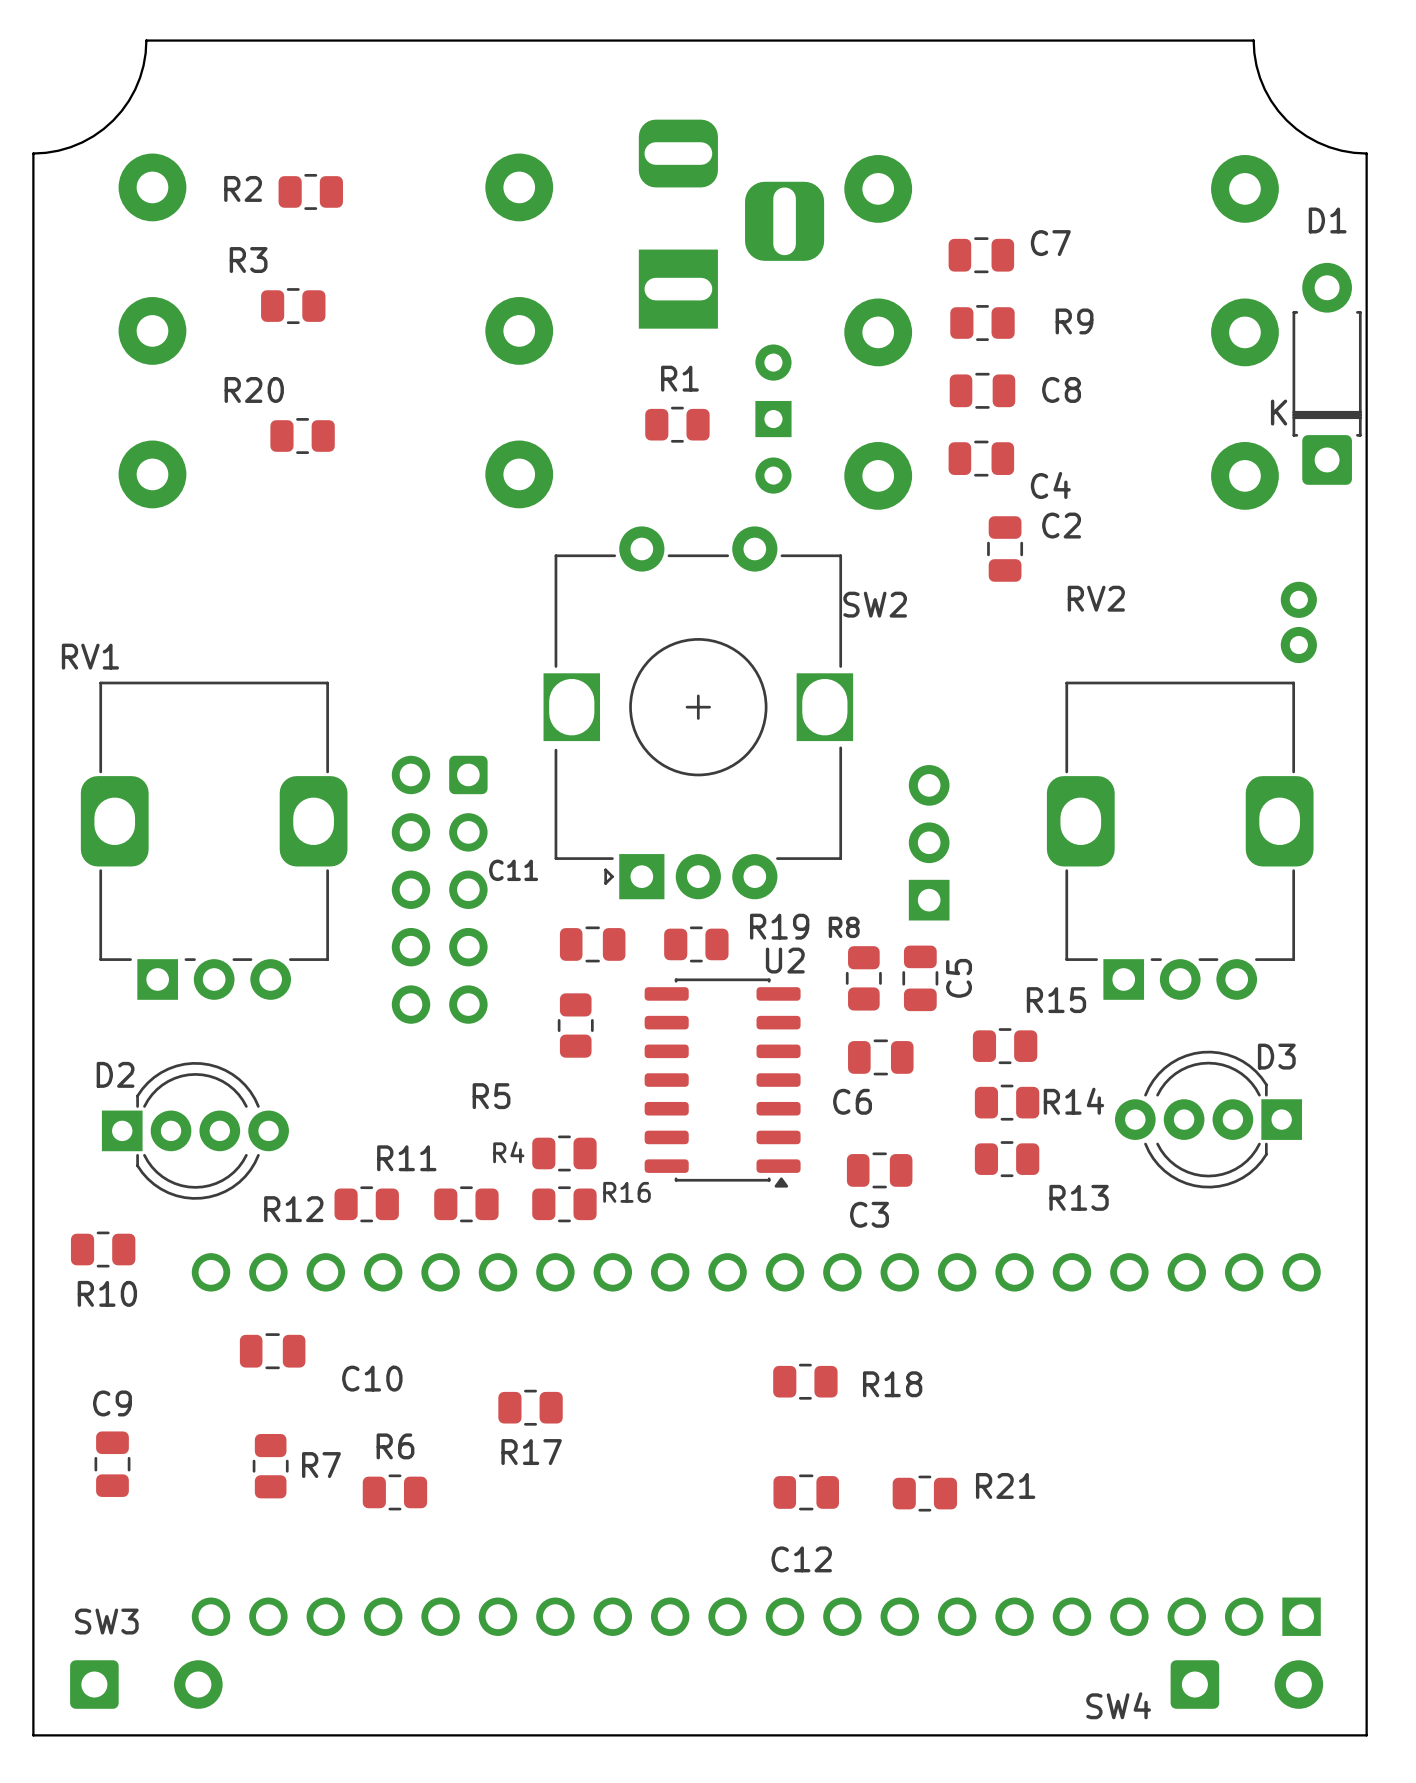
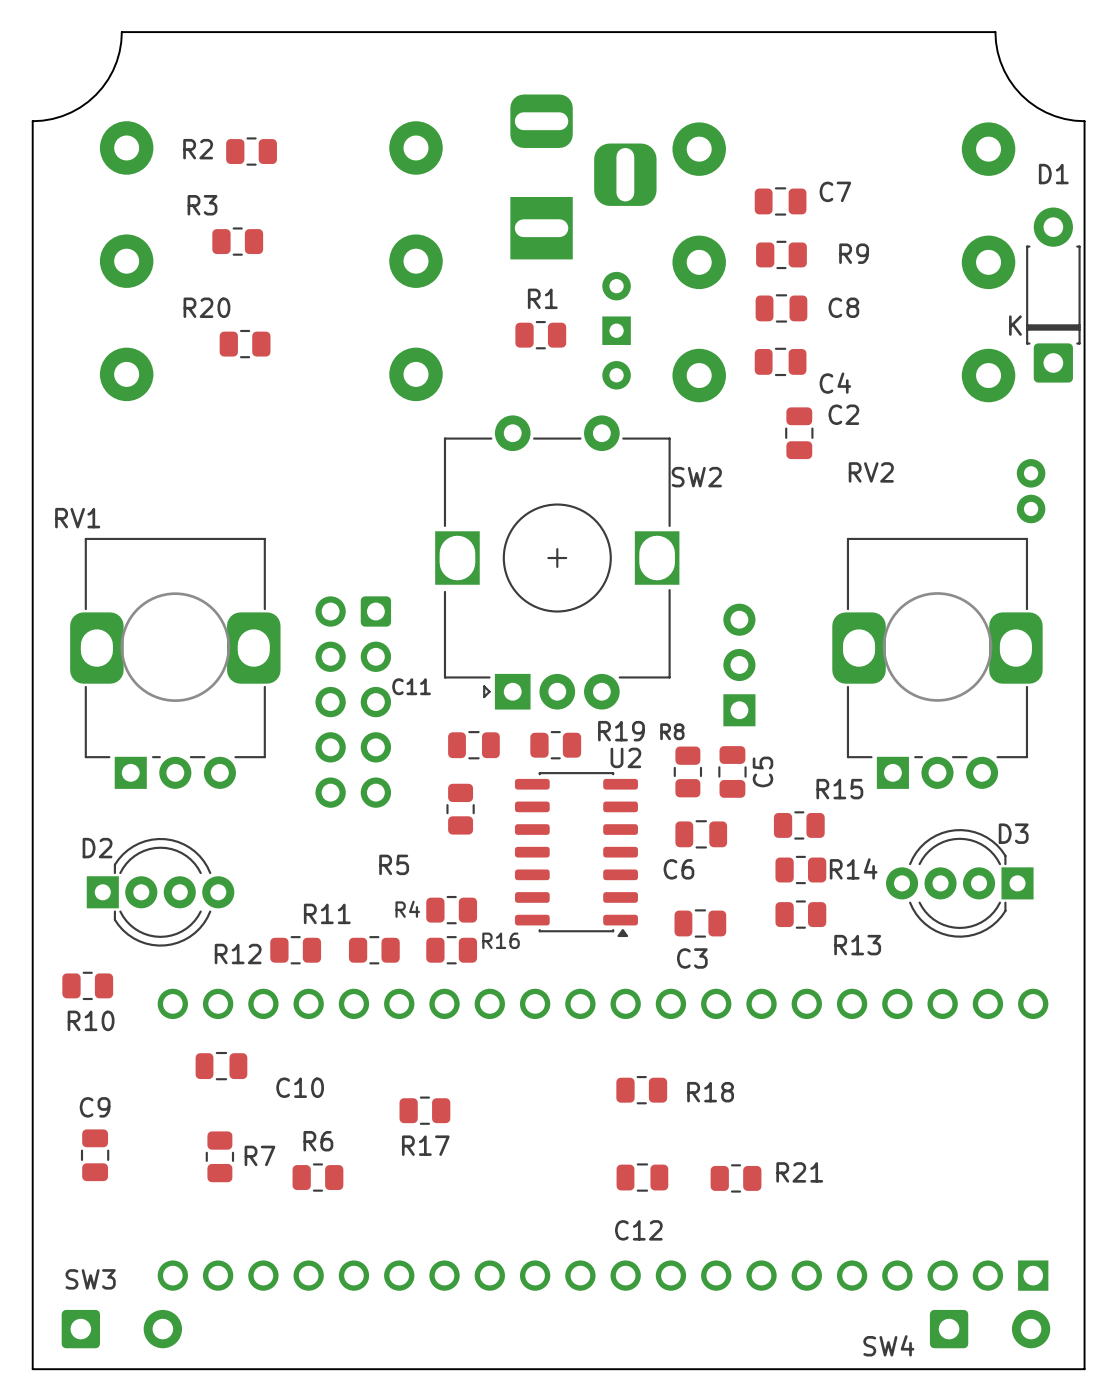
drawing: none -> [120, 592, 231, 702]
drawing: none -> [882, 592, 993, 702]

